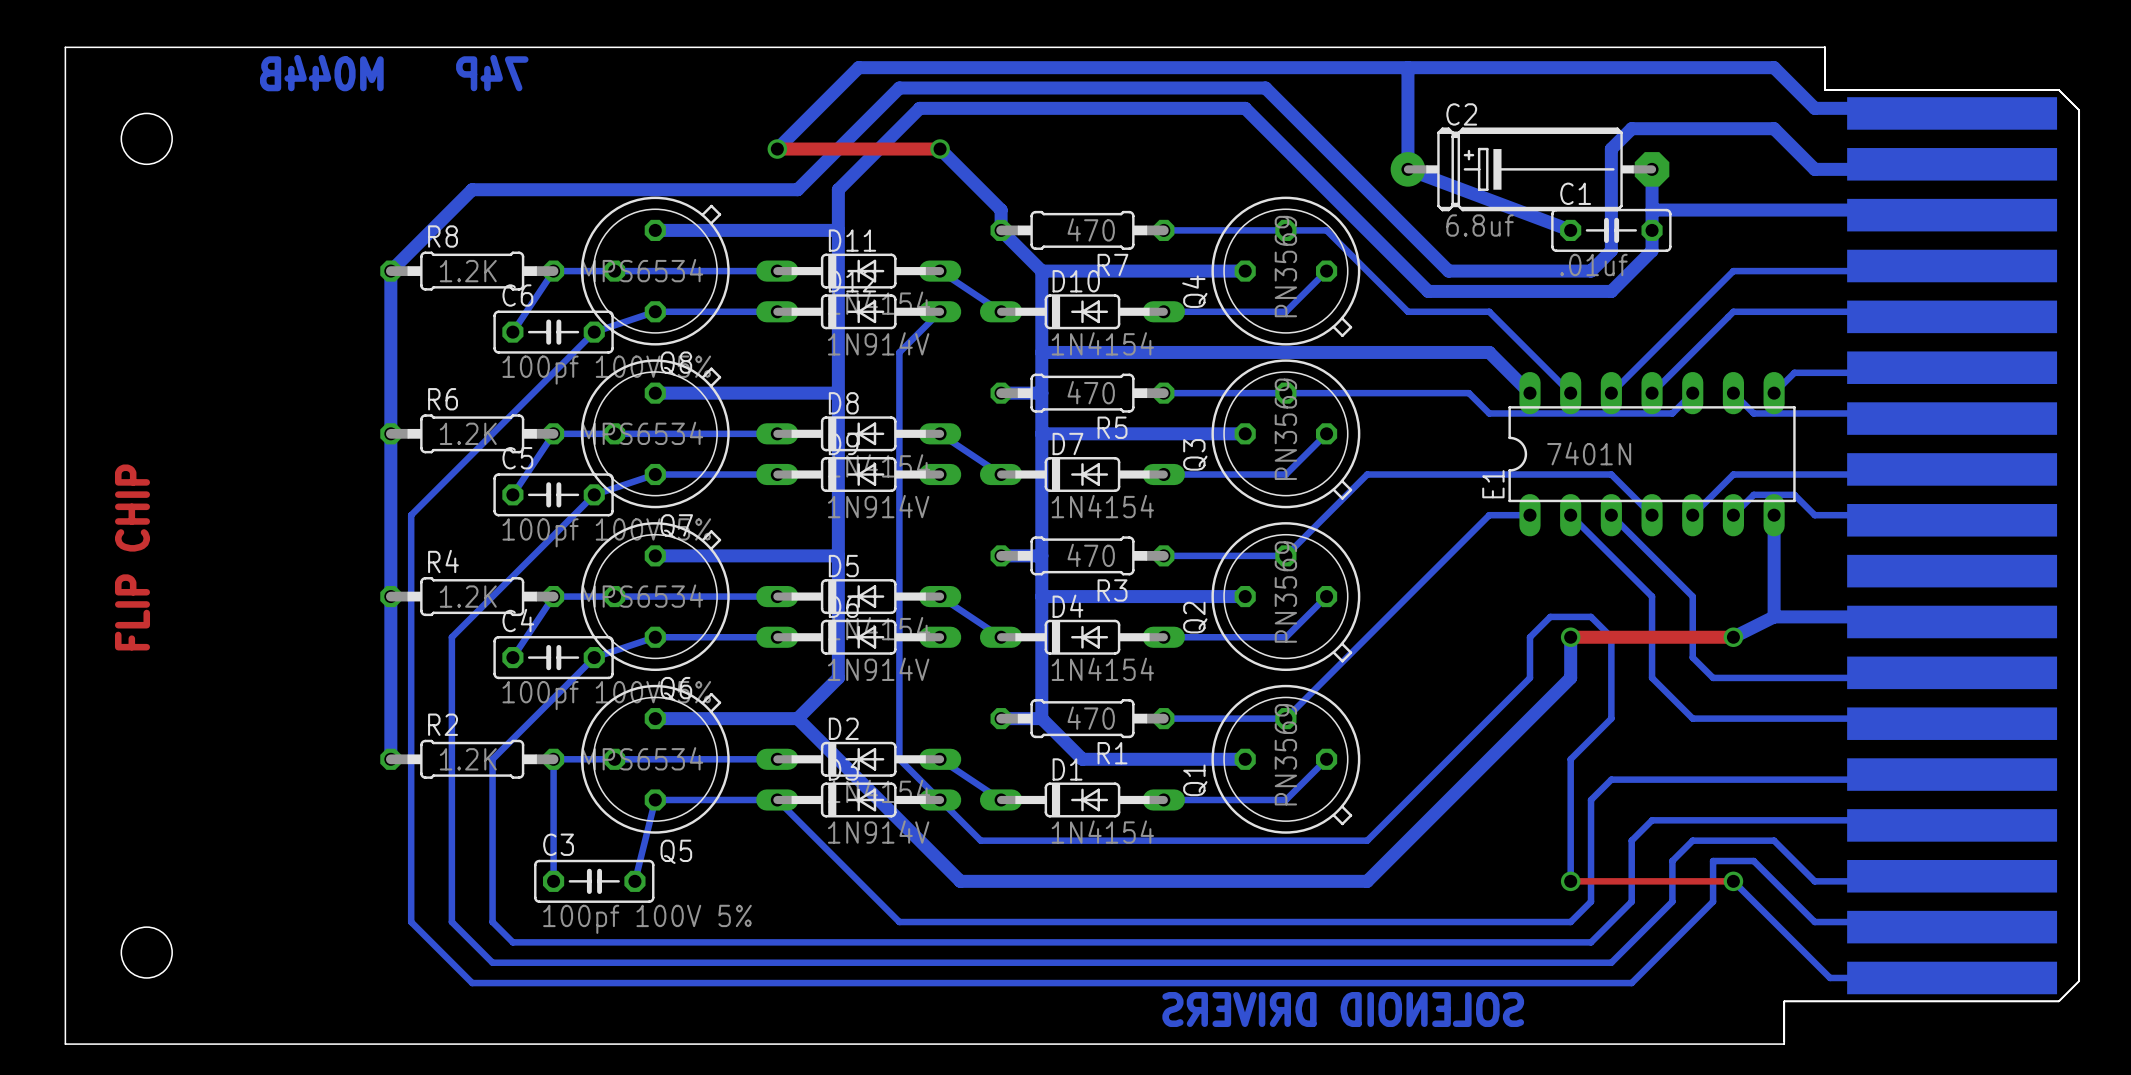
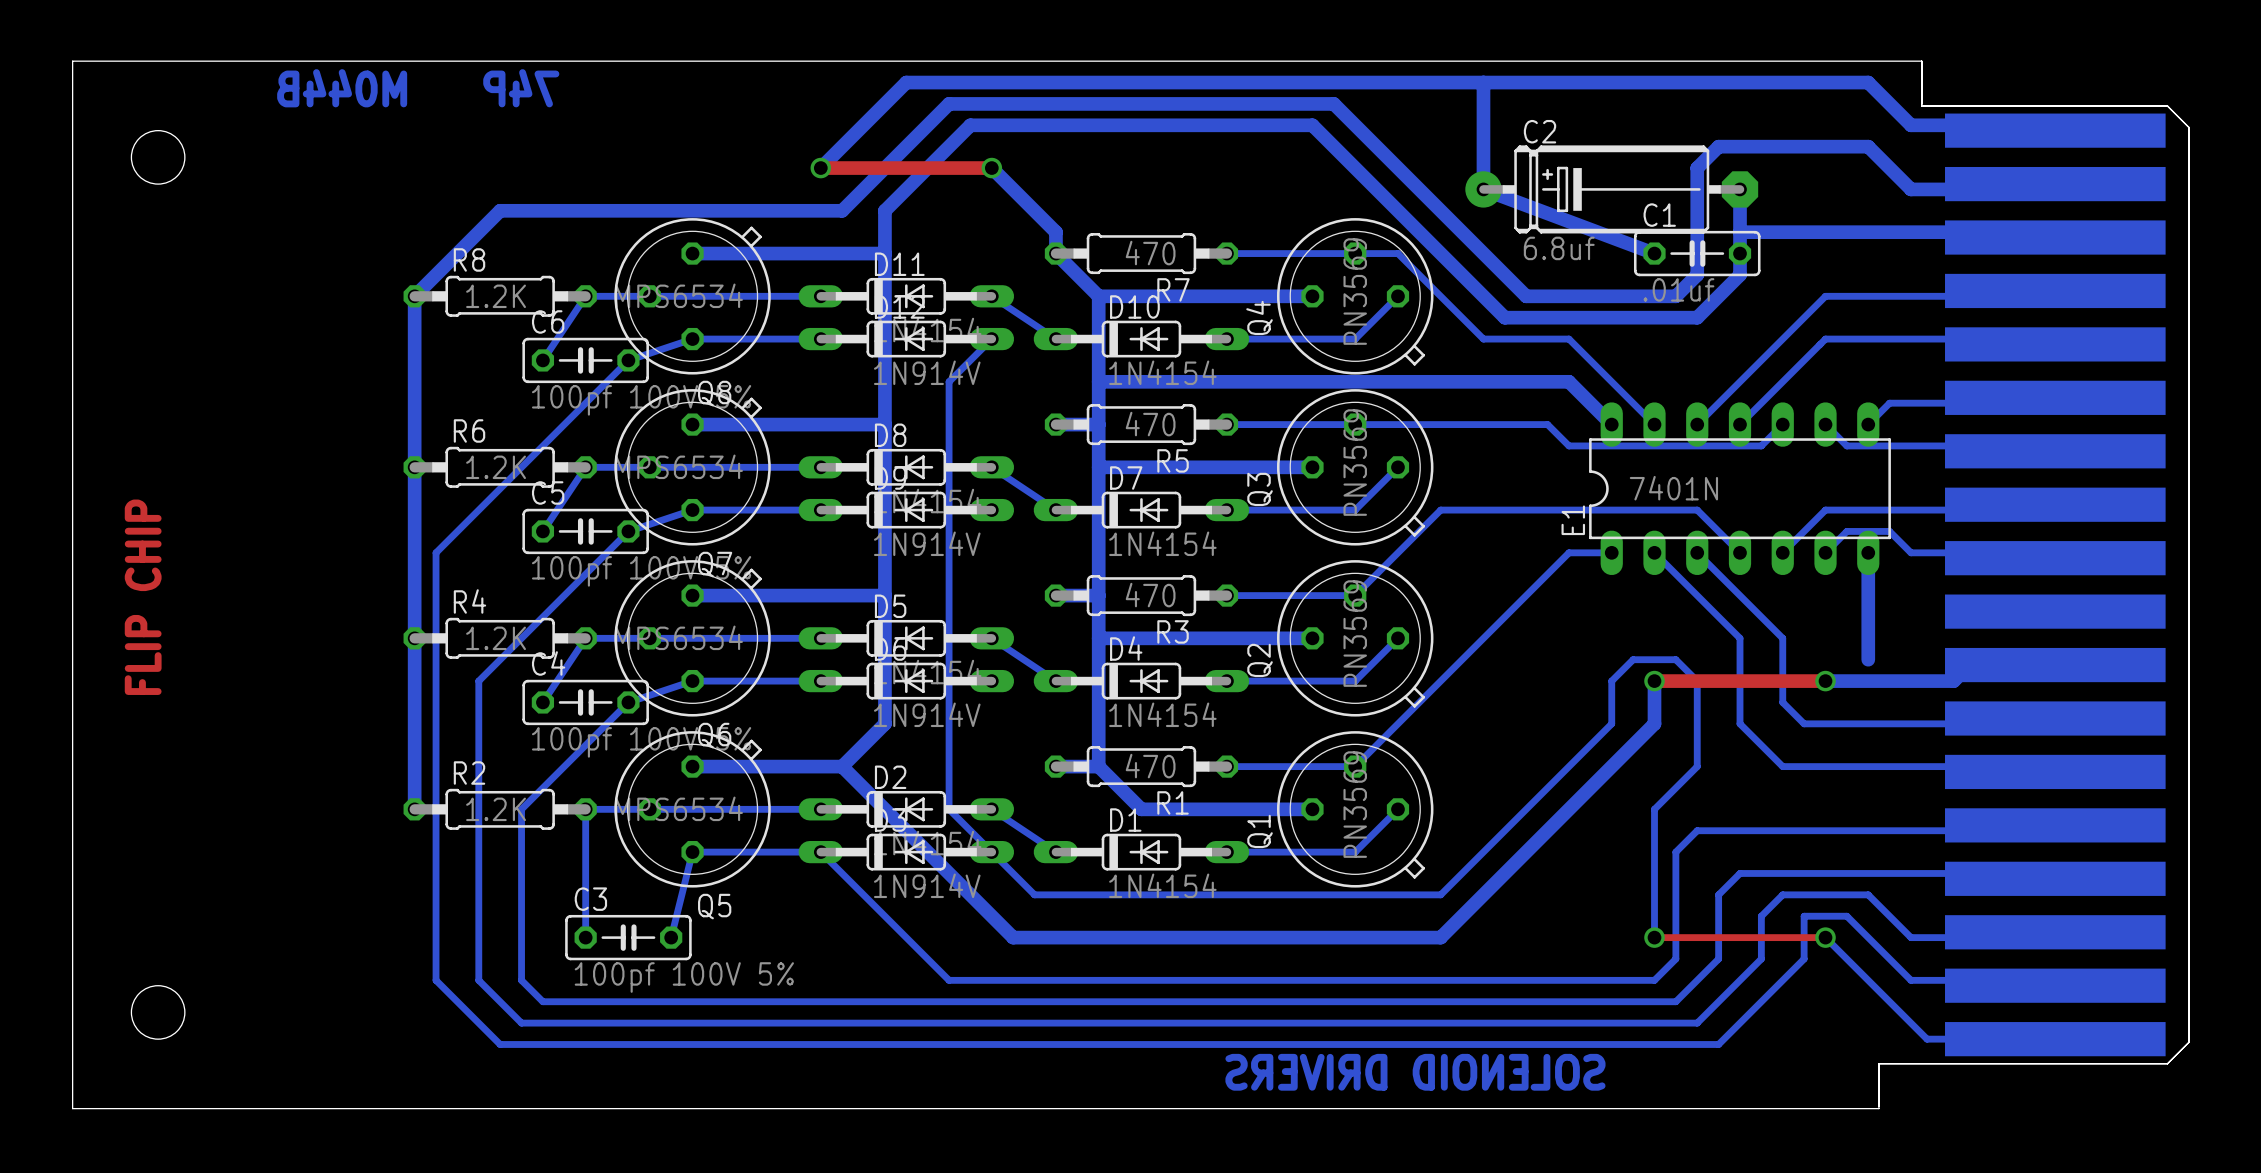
bottom track: (1870, 622) (1855, 616) (1774, 616) (1733, 637) -> (1969, 665) (1953, 681) (1825, 681)

